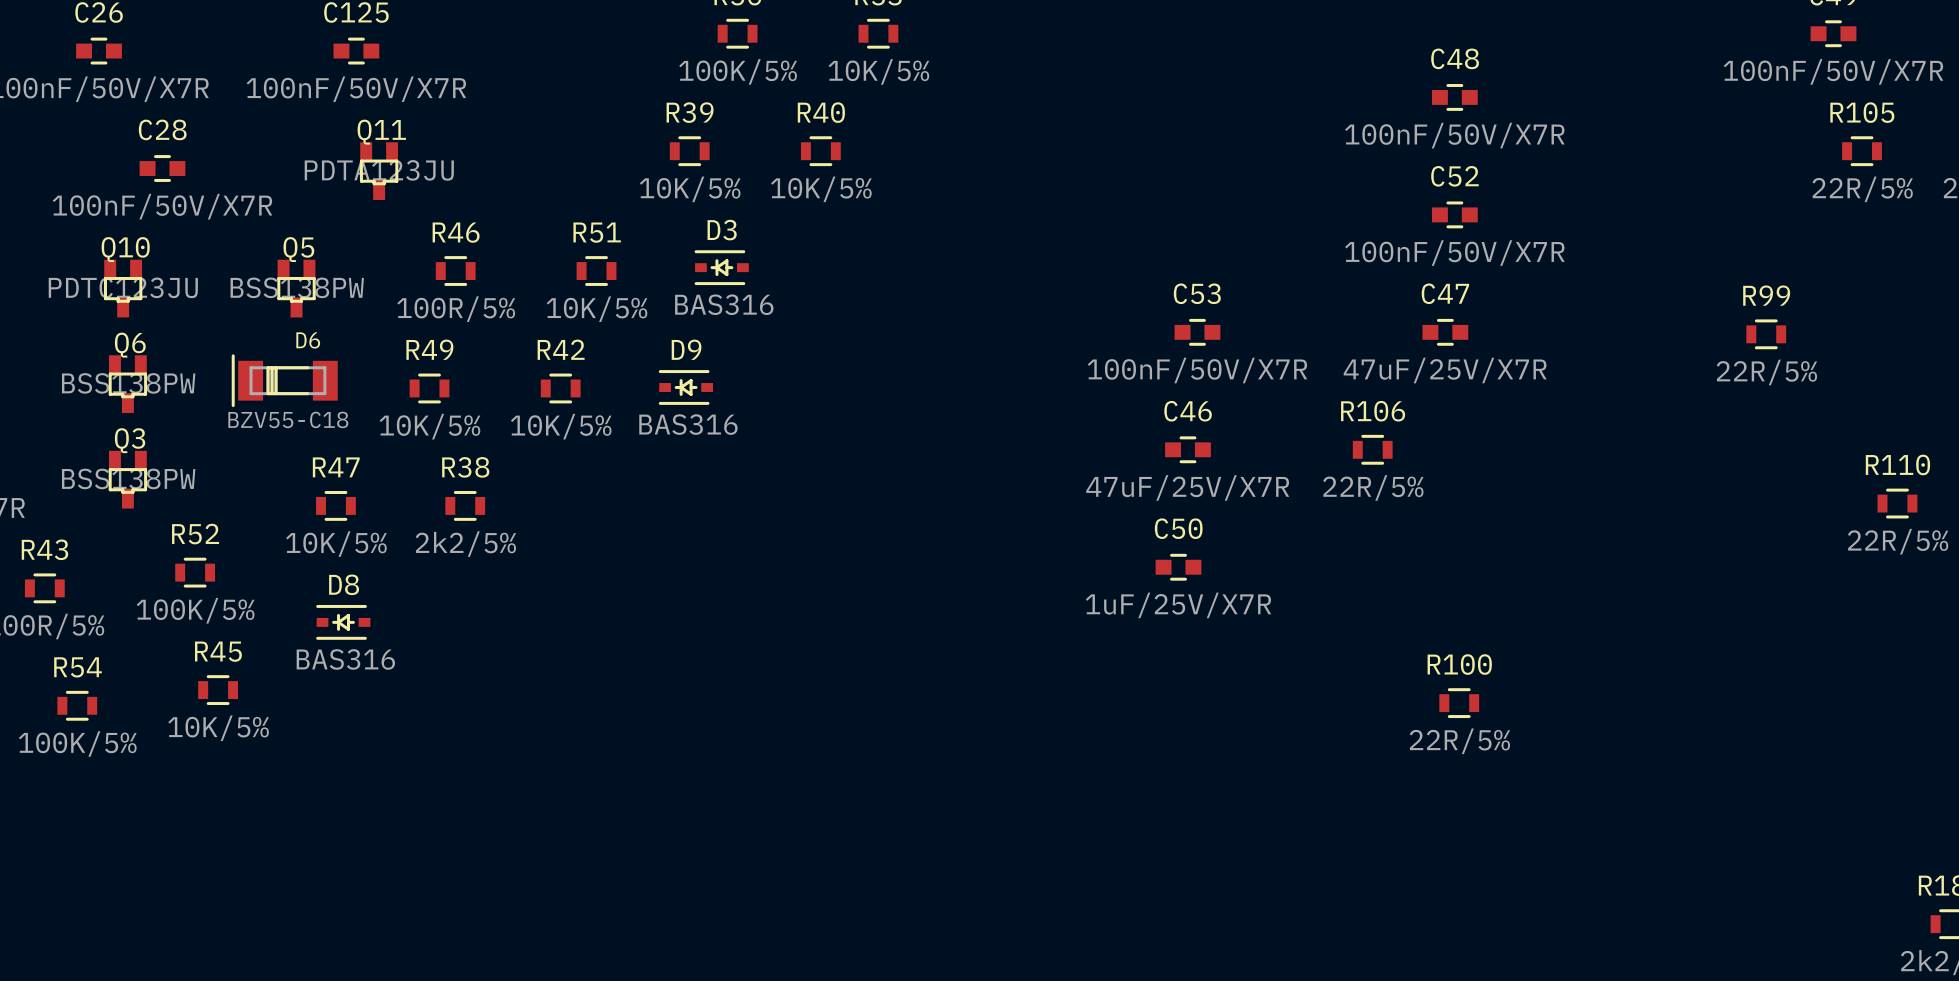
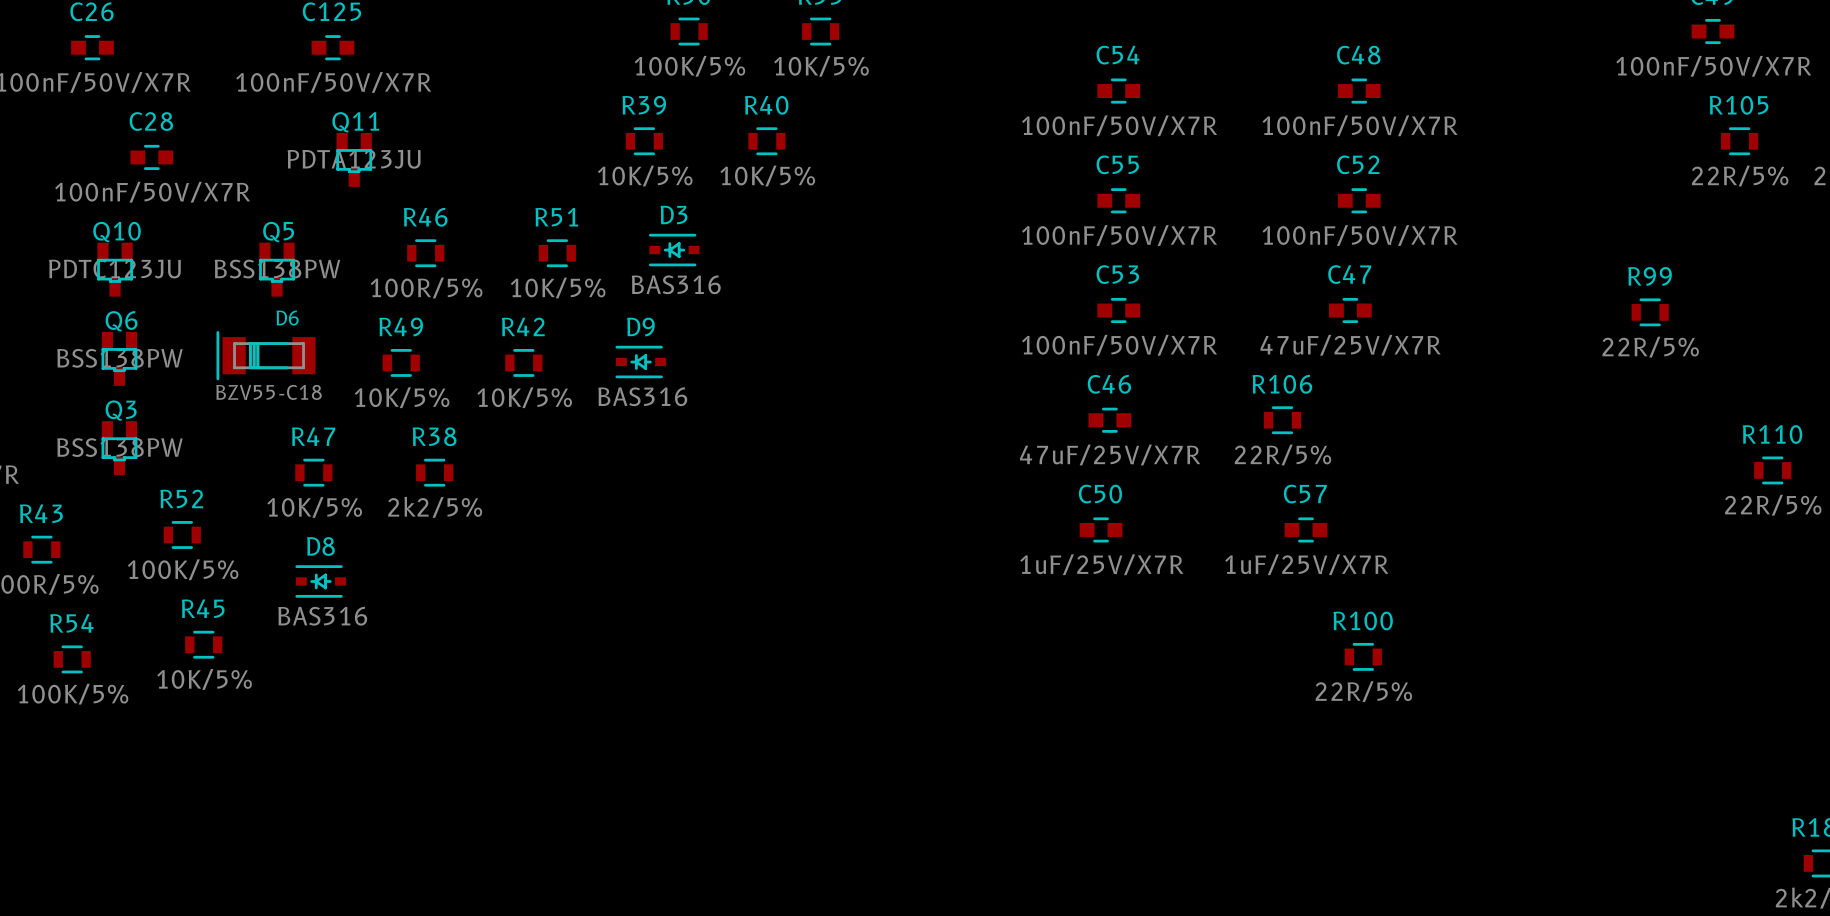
C54: none -> 100nF/50V/X7R (1118, 91)
C55: none -> 100nF/50V/X7R (1118, 200)
C57: none -> 1uF/25V/X7R (1305, 529)

